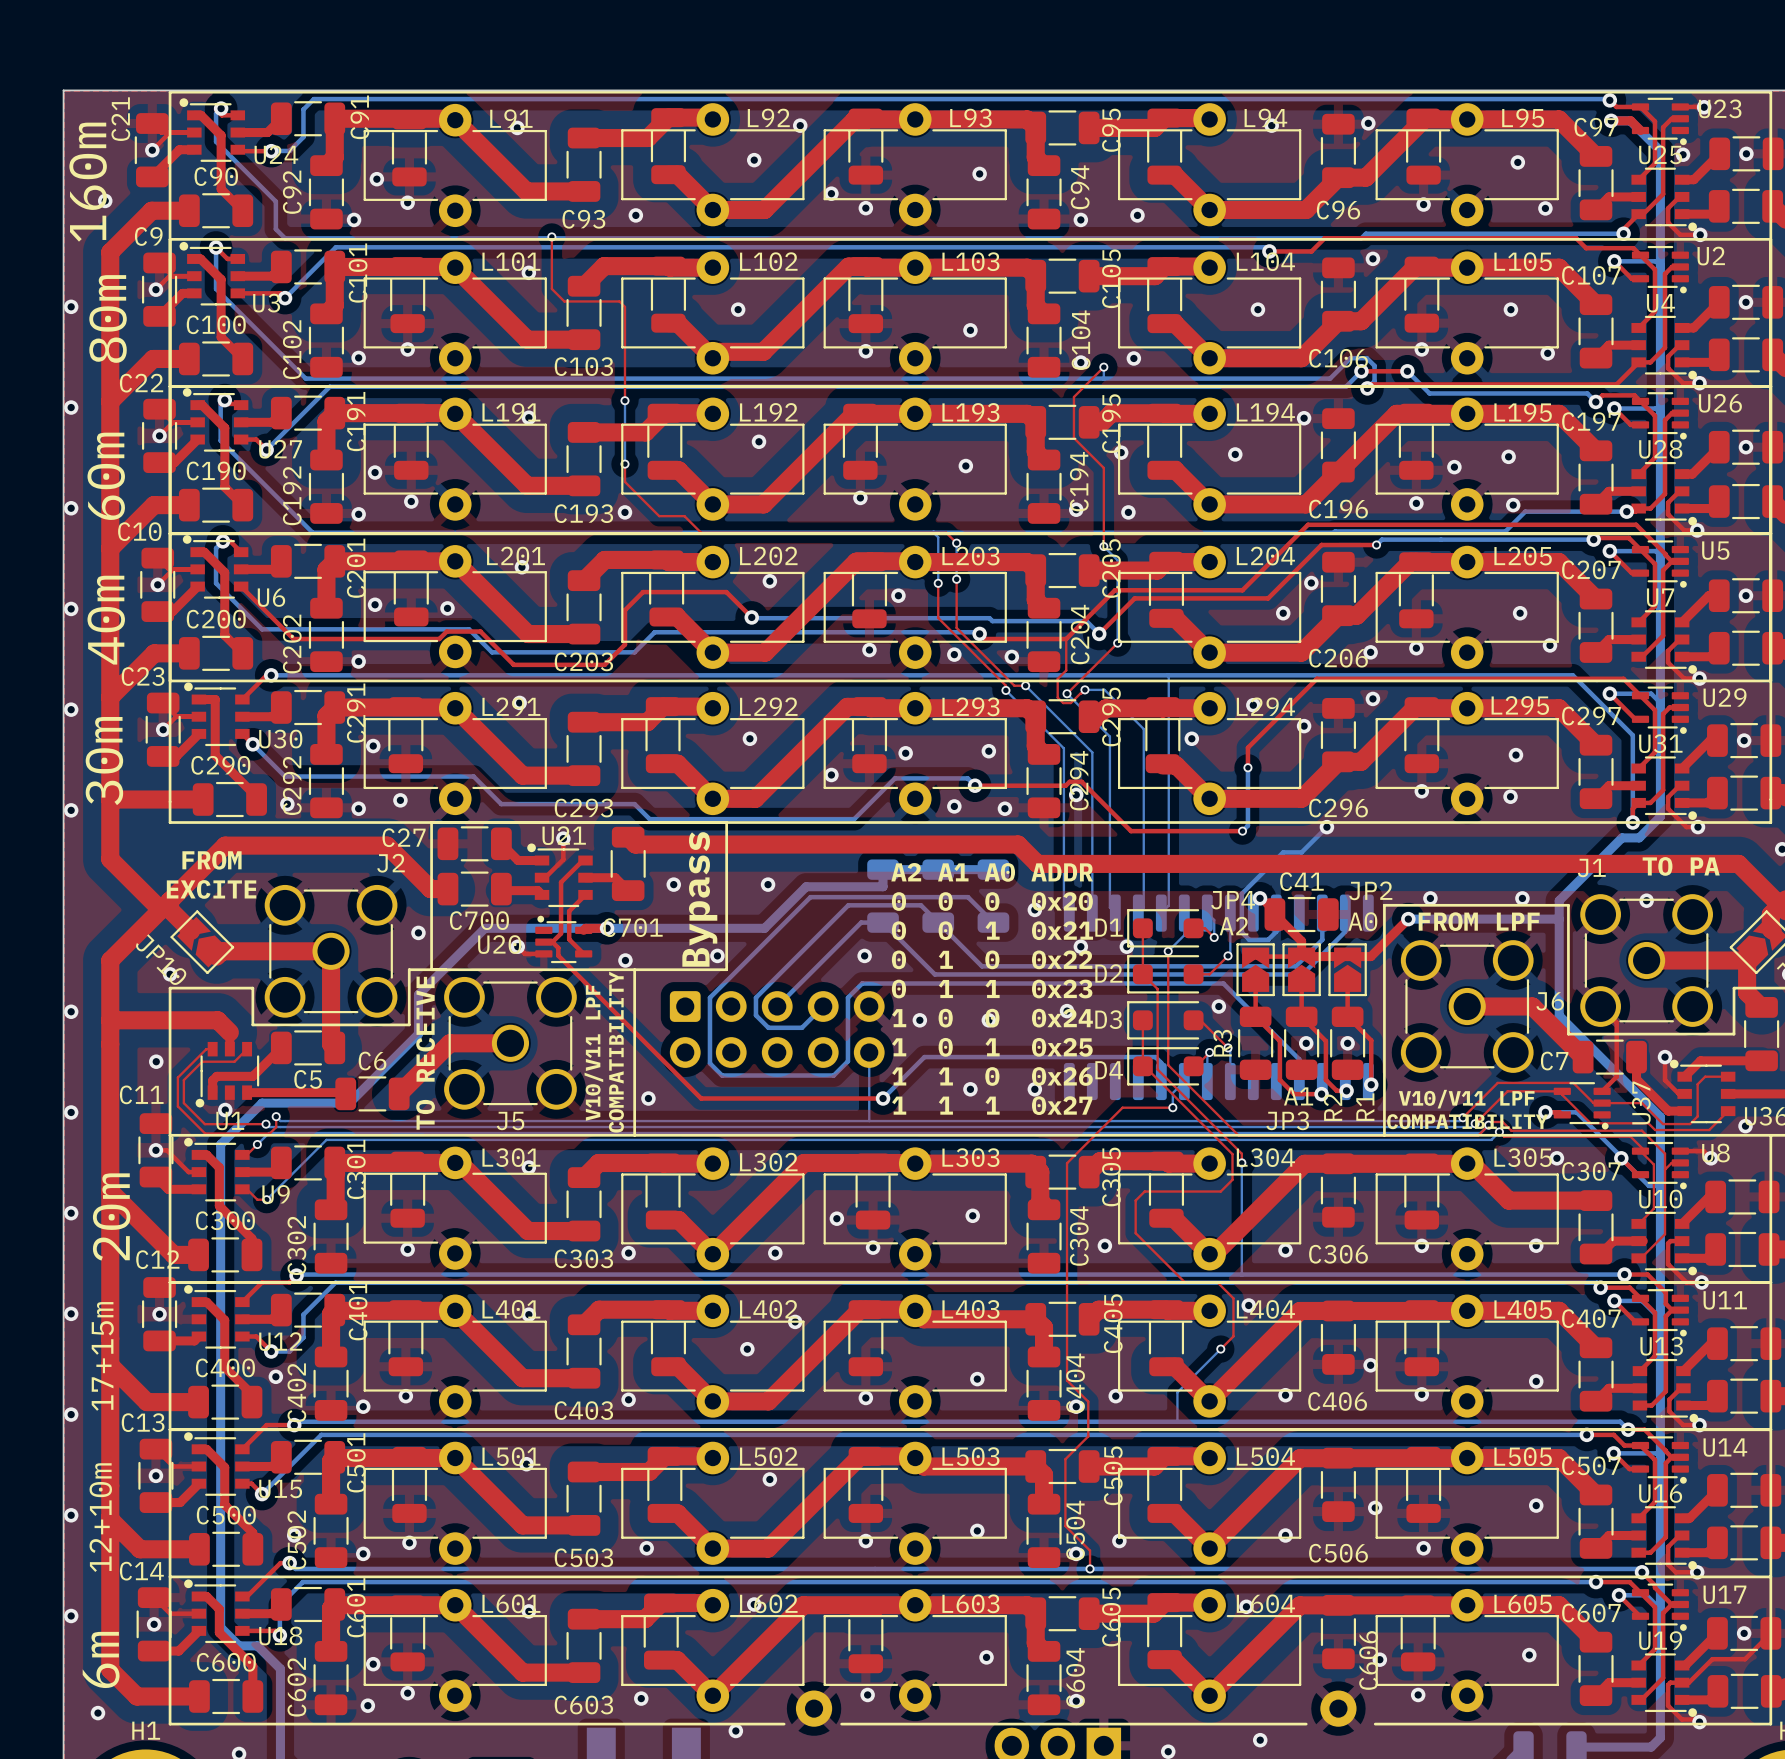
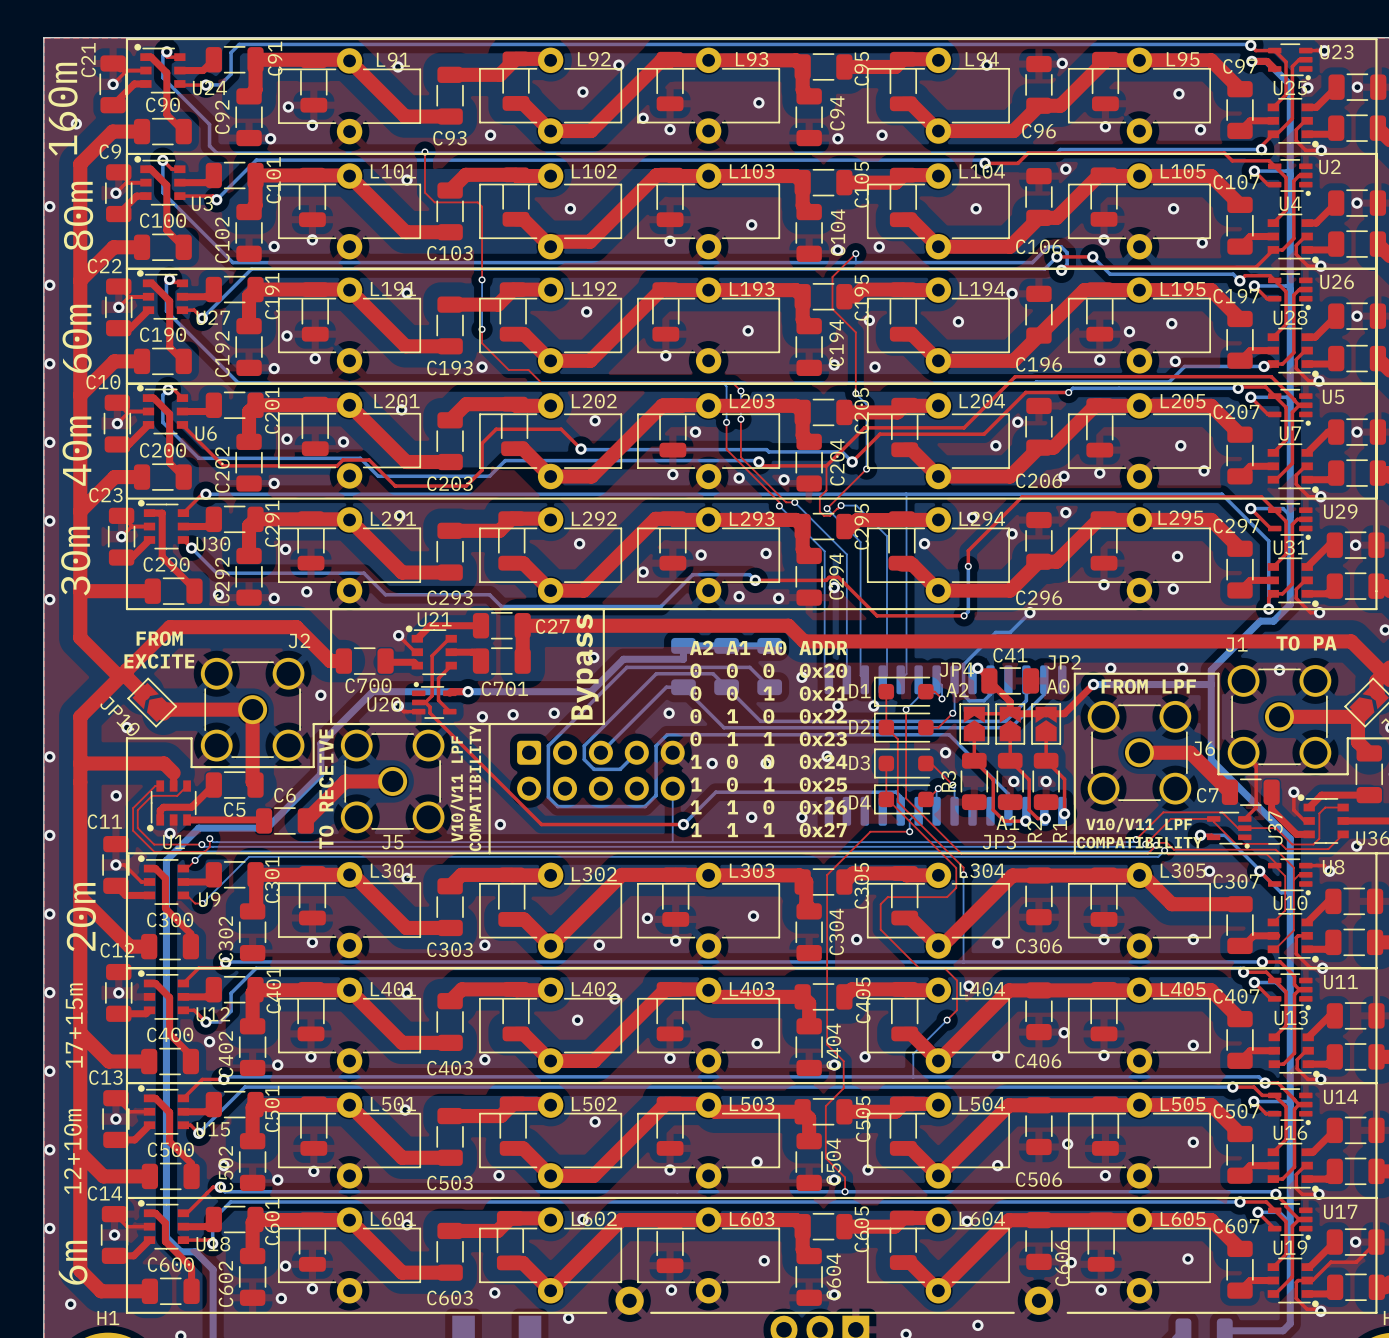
line: (726, 822) (726, 969) -> (603, 609) (603, 724) (561, 724)
C27 name position: C27 (404, 837) -> C27 (552, 626)
top track: (628, 837) (635, 844) (1018, 844) -> (522, 661) (522, 625) (788, 626)
top track: (563, 838) (563, 859) (546, 876) (542, 876) -> (398, 635) (414, 651) (417, 651)
via position: (563, 838) -> (398, 635)
C27 position: (474, 843) -> (501, 625)
top track: (501, 843) (518, 860) (542, 860) -> (480, 625) (430, 625) (417, 638)
C701 rotation: 0° (628, 863) -> 90° clockwise (501, 661)
via position: (673, 884) -> (513, 714)
text position: Bypass (699, 899) -> Bypass (584, 667)

